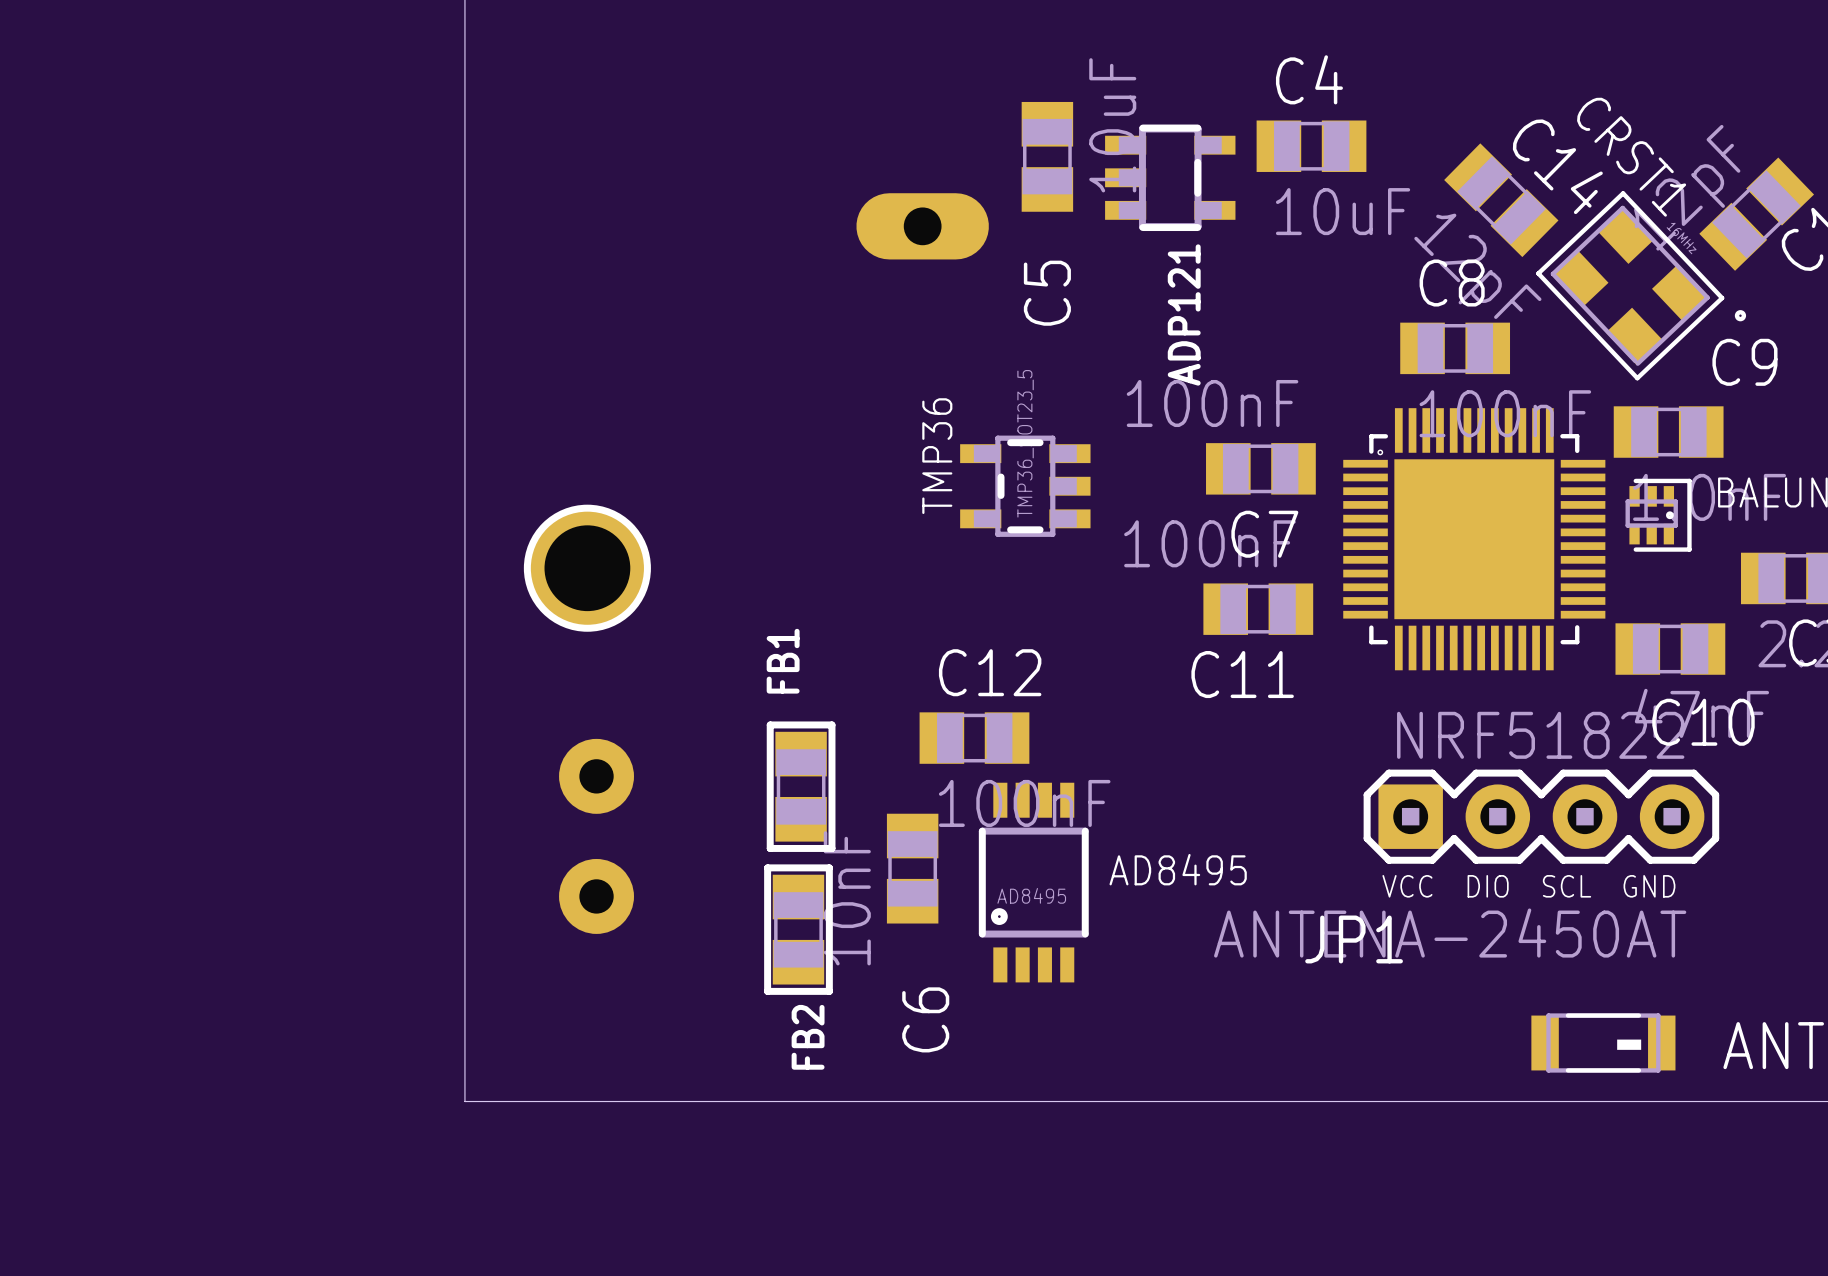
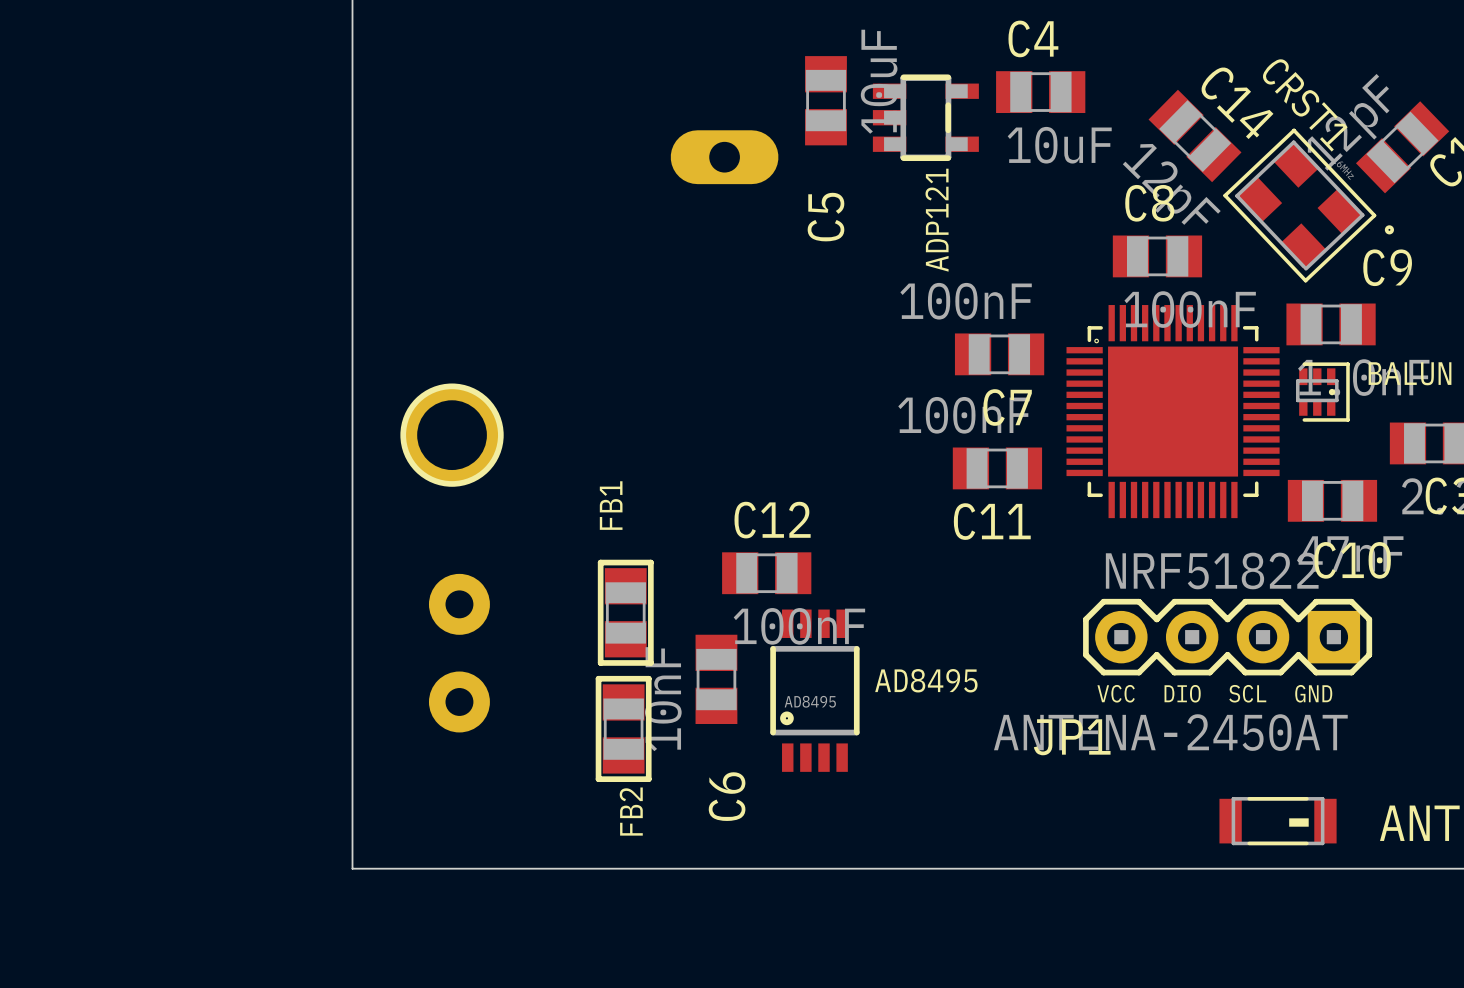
TMP36: TMP36_SOT23_5 (1025, 486) -> none
JP1 rotation: 0° (1541, 816) -> 180° (1227, 637)

